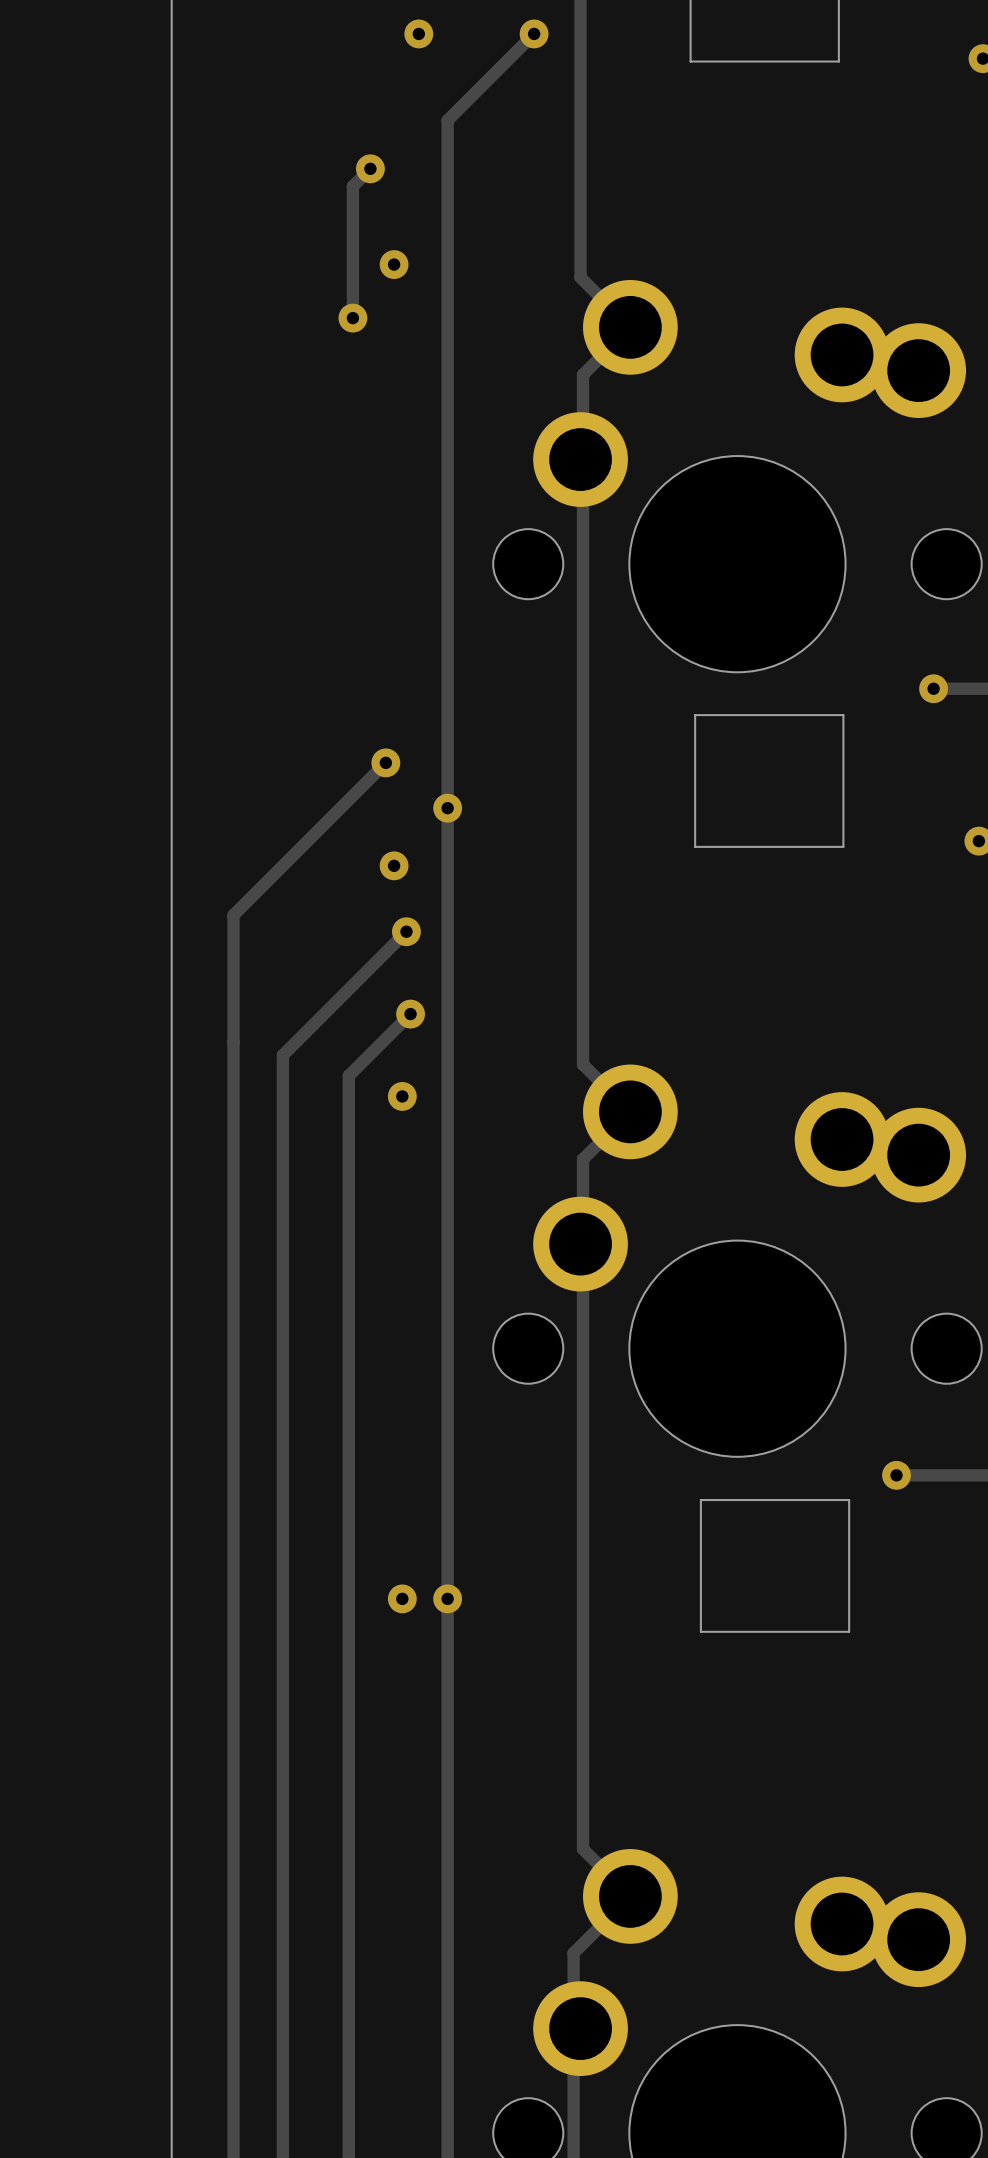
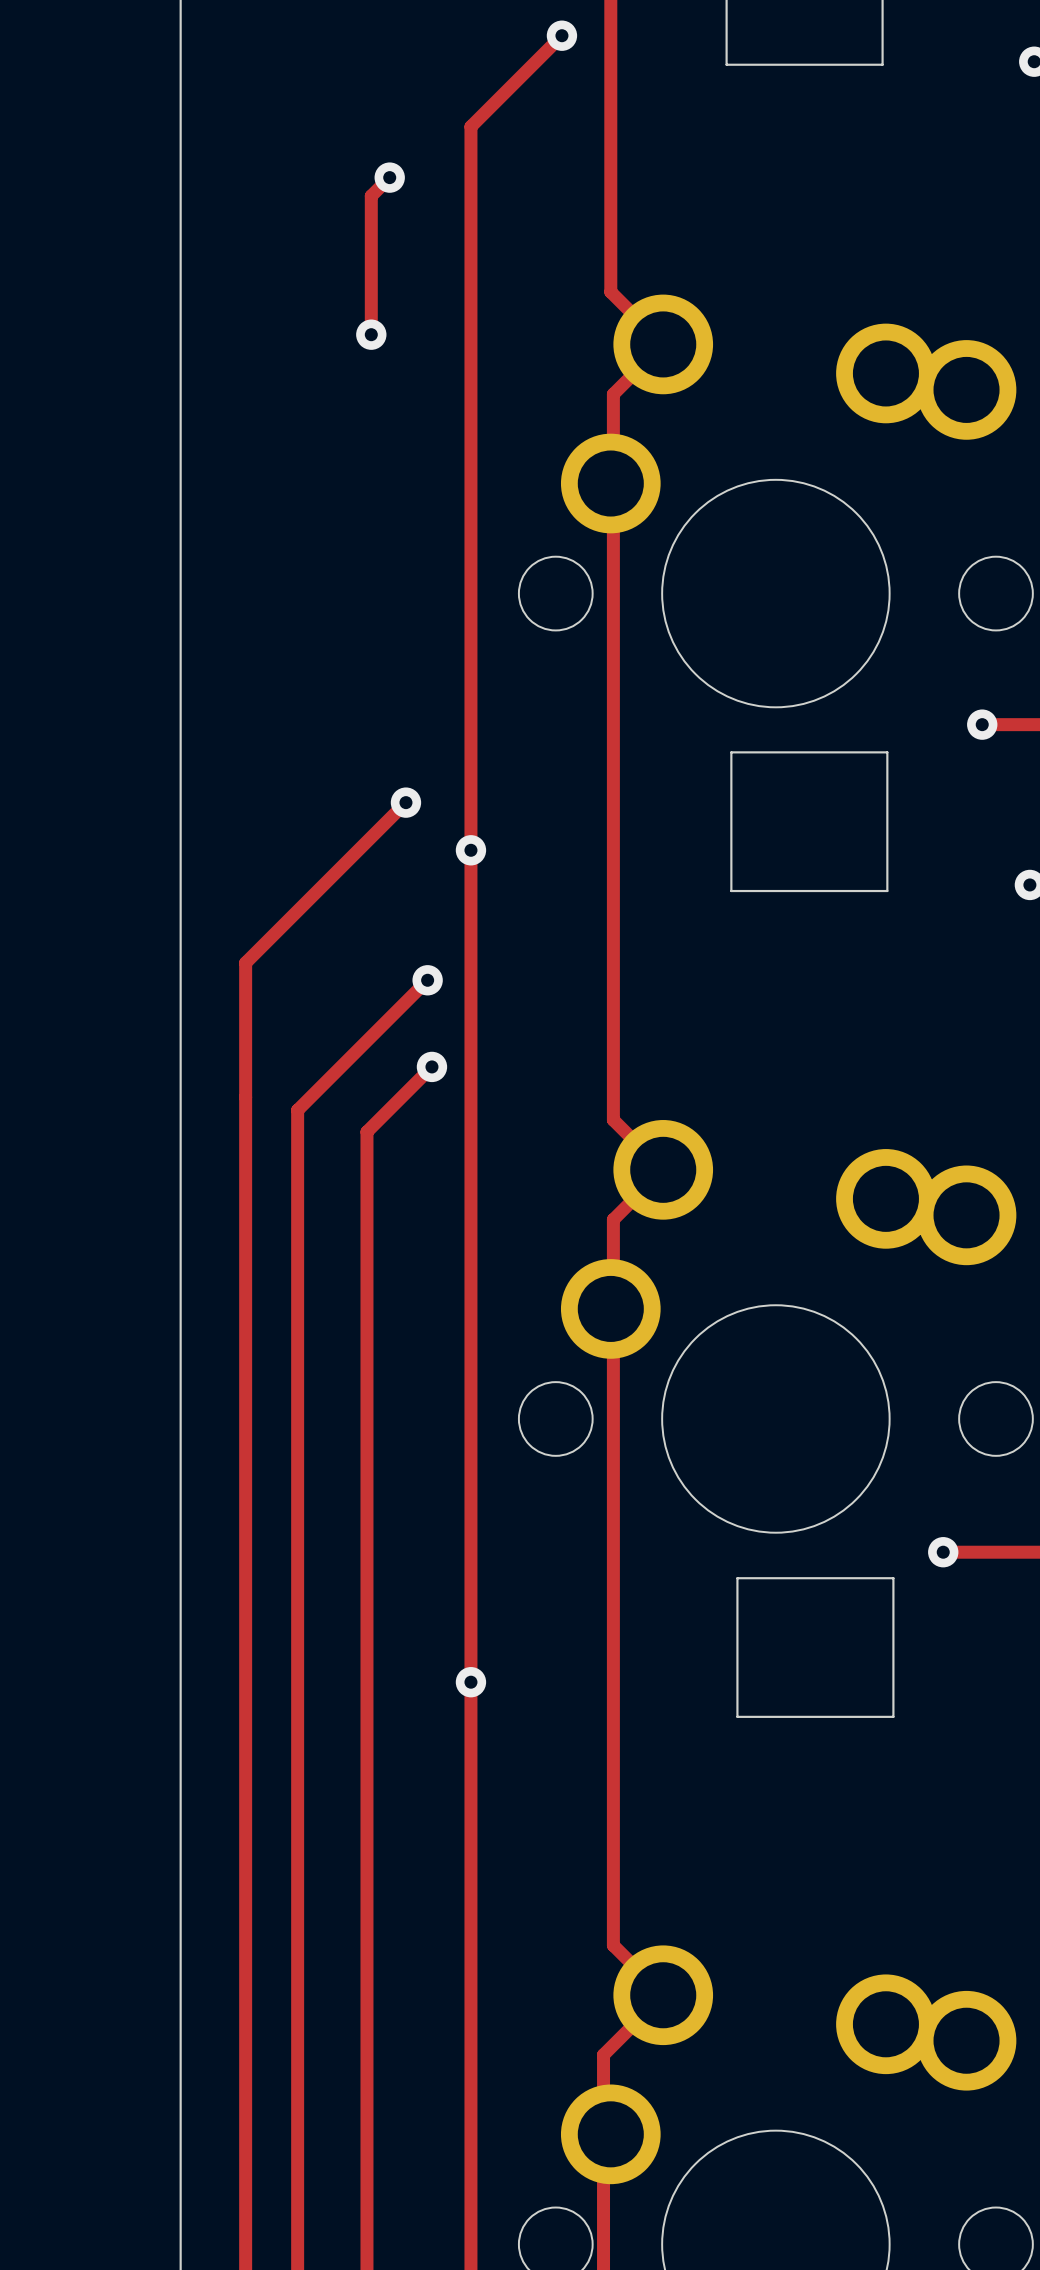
via: (418, 33) -> none
via: (394, 264) -> none
via: (394, 865) -> none
via: (402, 1096) -> none
via: (402, 1598) -> none

